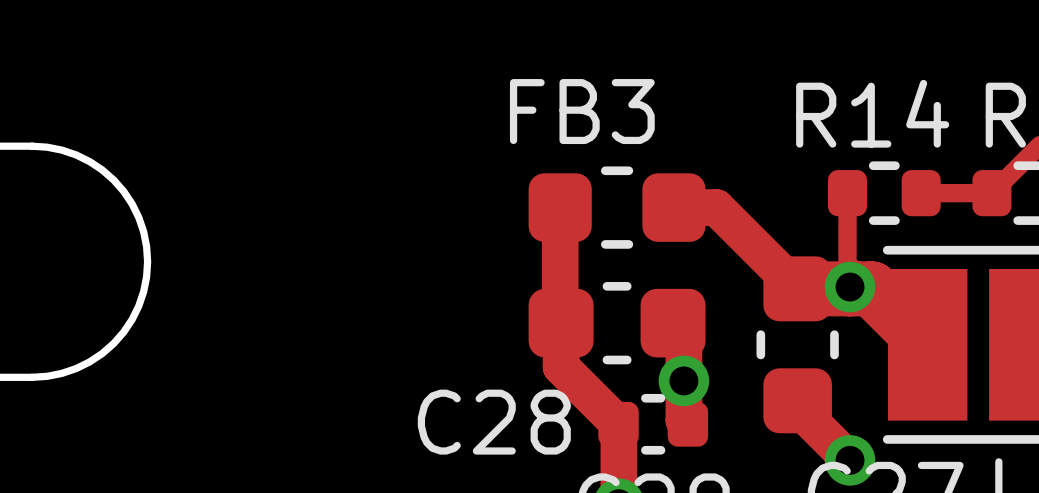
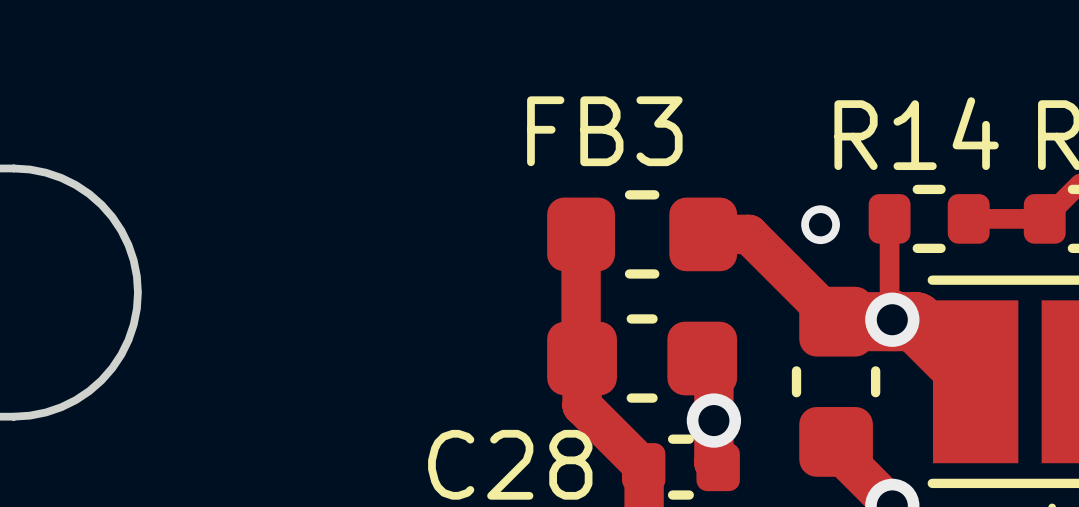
via: none -> (820, 224)

